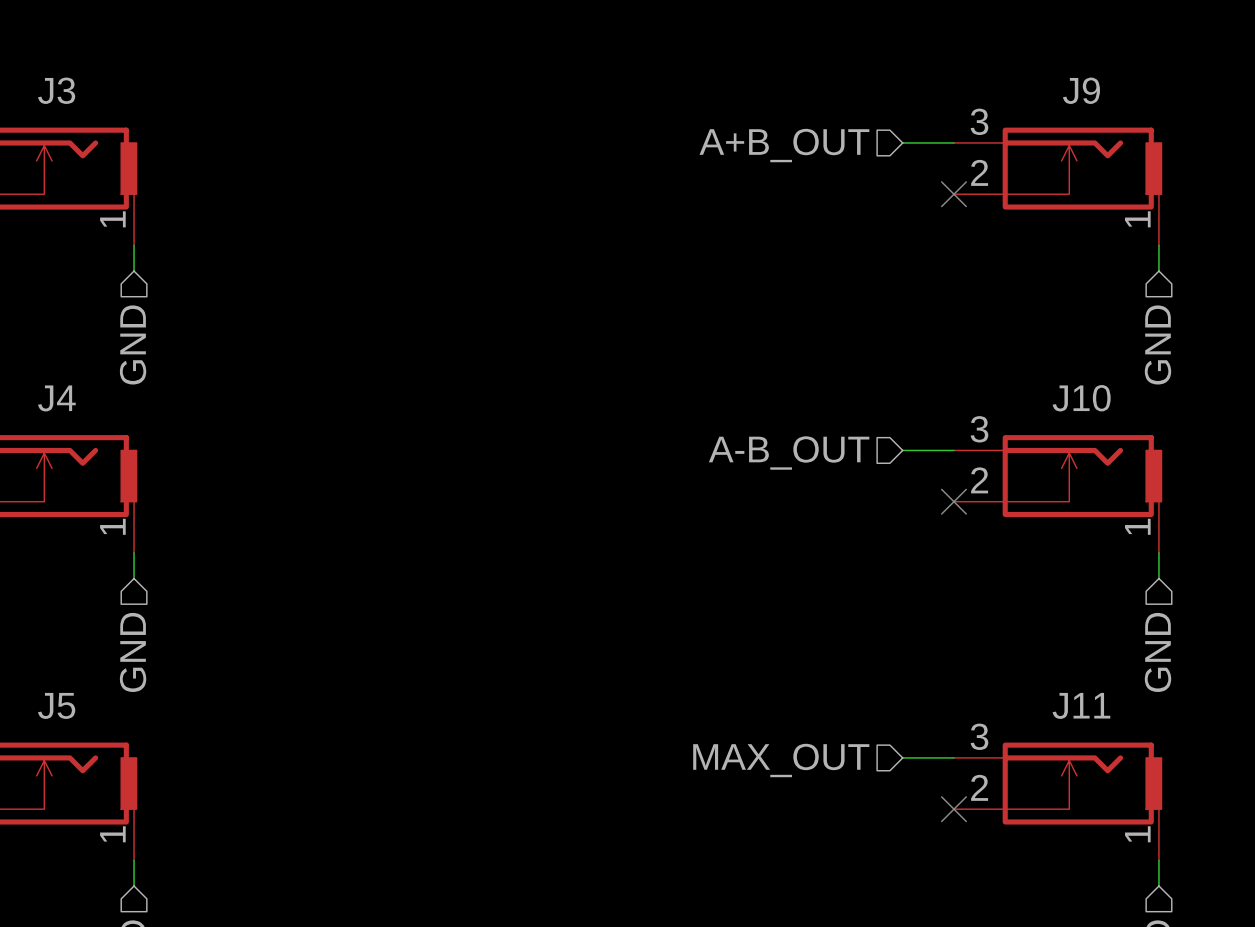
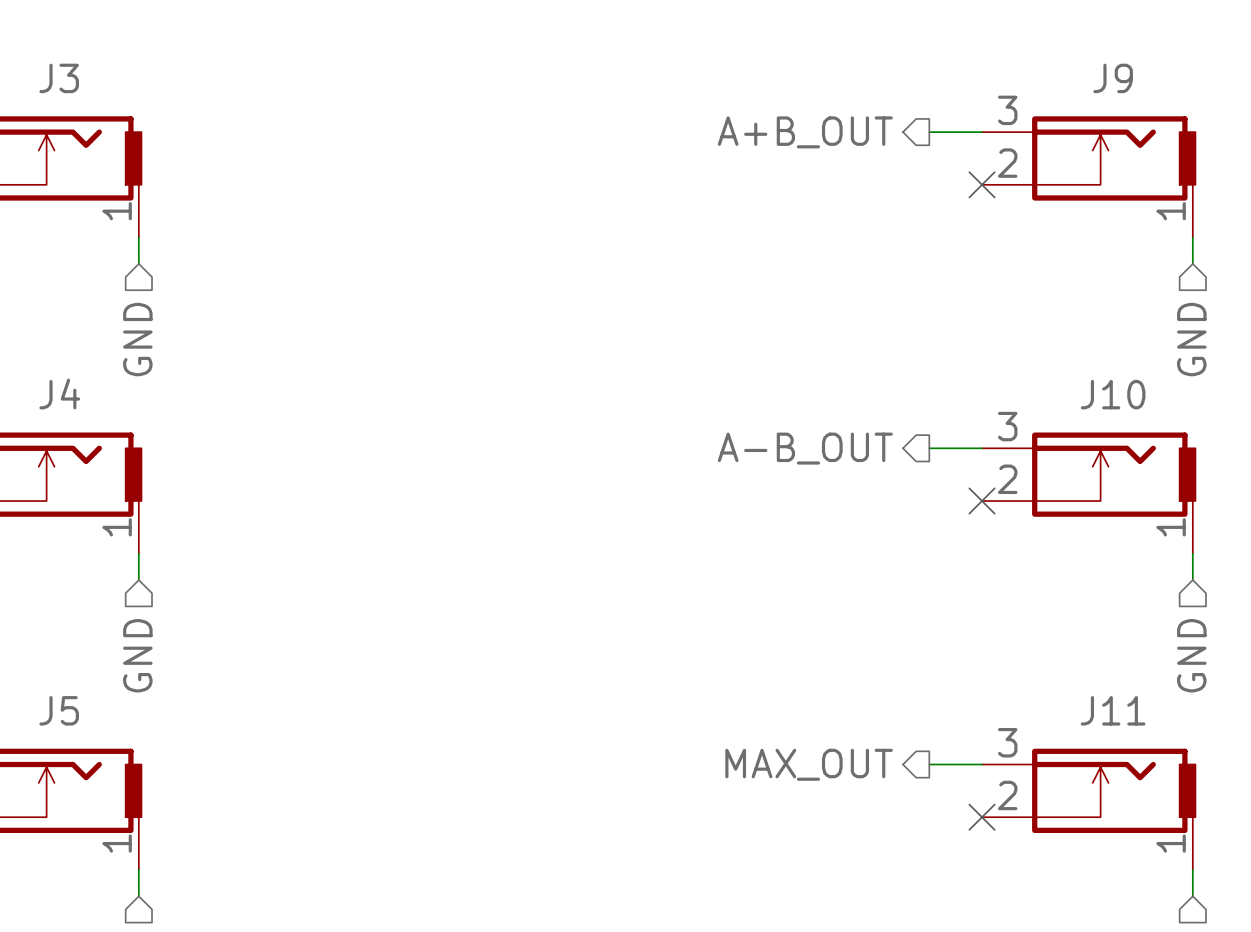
hierarchical label shape: input (784, 145) -> output (805, 132)
hierarchical label shape: input (789, 453) -> output (805, 448)
hierarchical label shape: input (781, 760) -> output (809, 764)

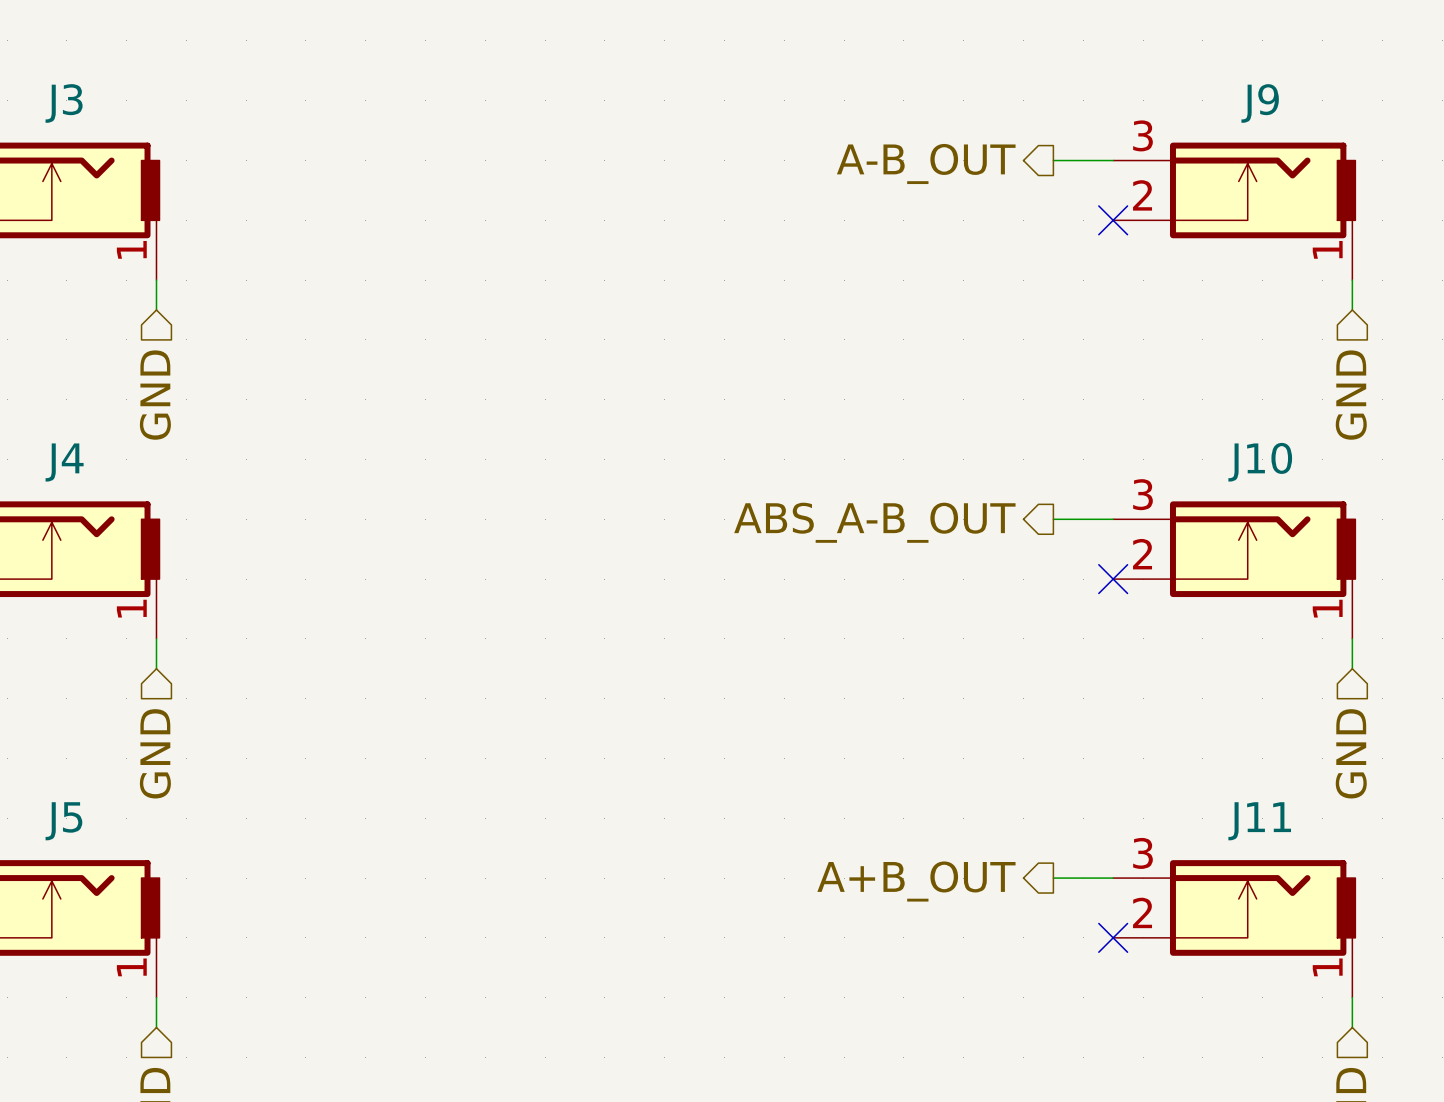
hierarchical label: A+B_OUT (805, 132) -> A-B_OUT (926, 163)
hierarchical label: A-B_OUT (805, 448) -> ABS_A-B_OUT (874, 522)
hierarchical label: MAX_OUT (809, 764) -> A+B_OUT (916, 881)

